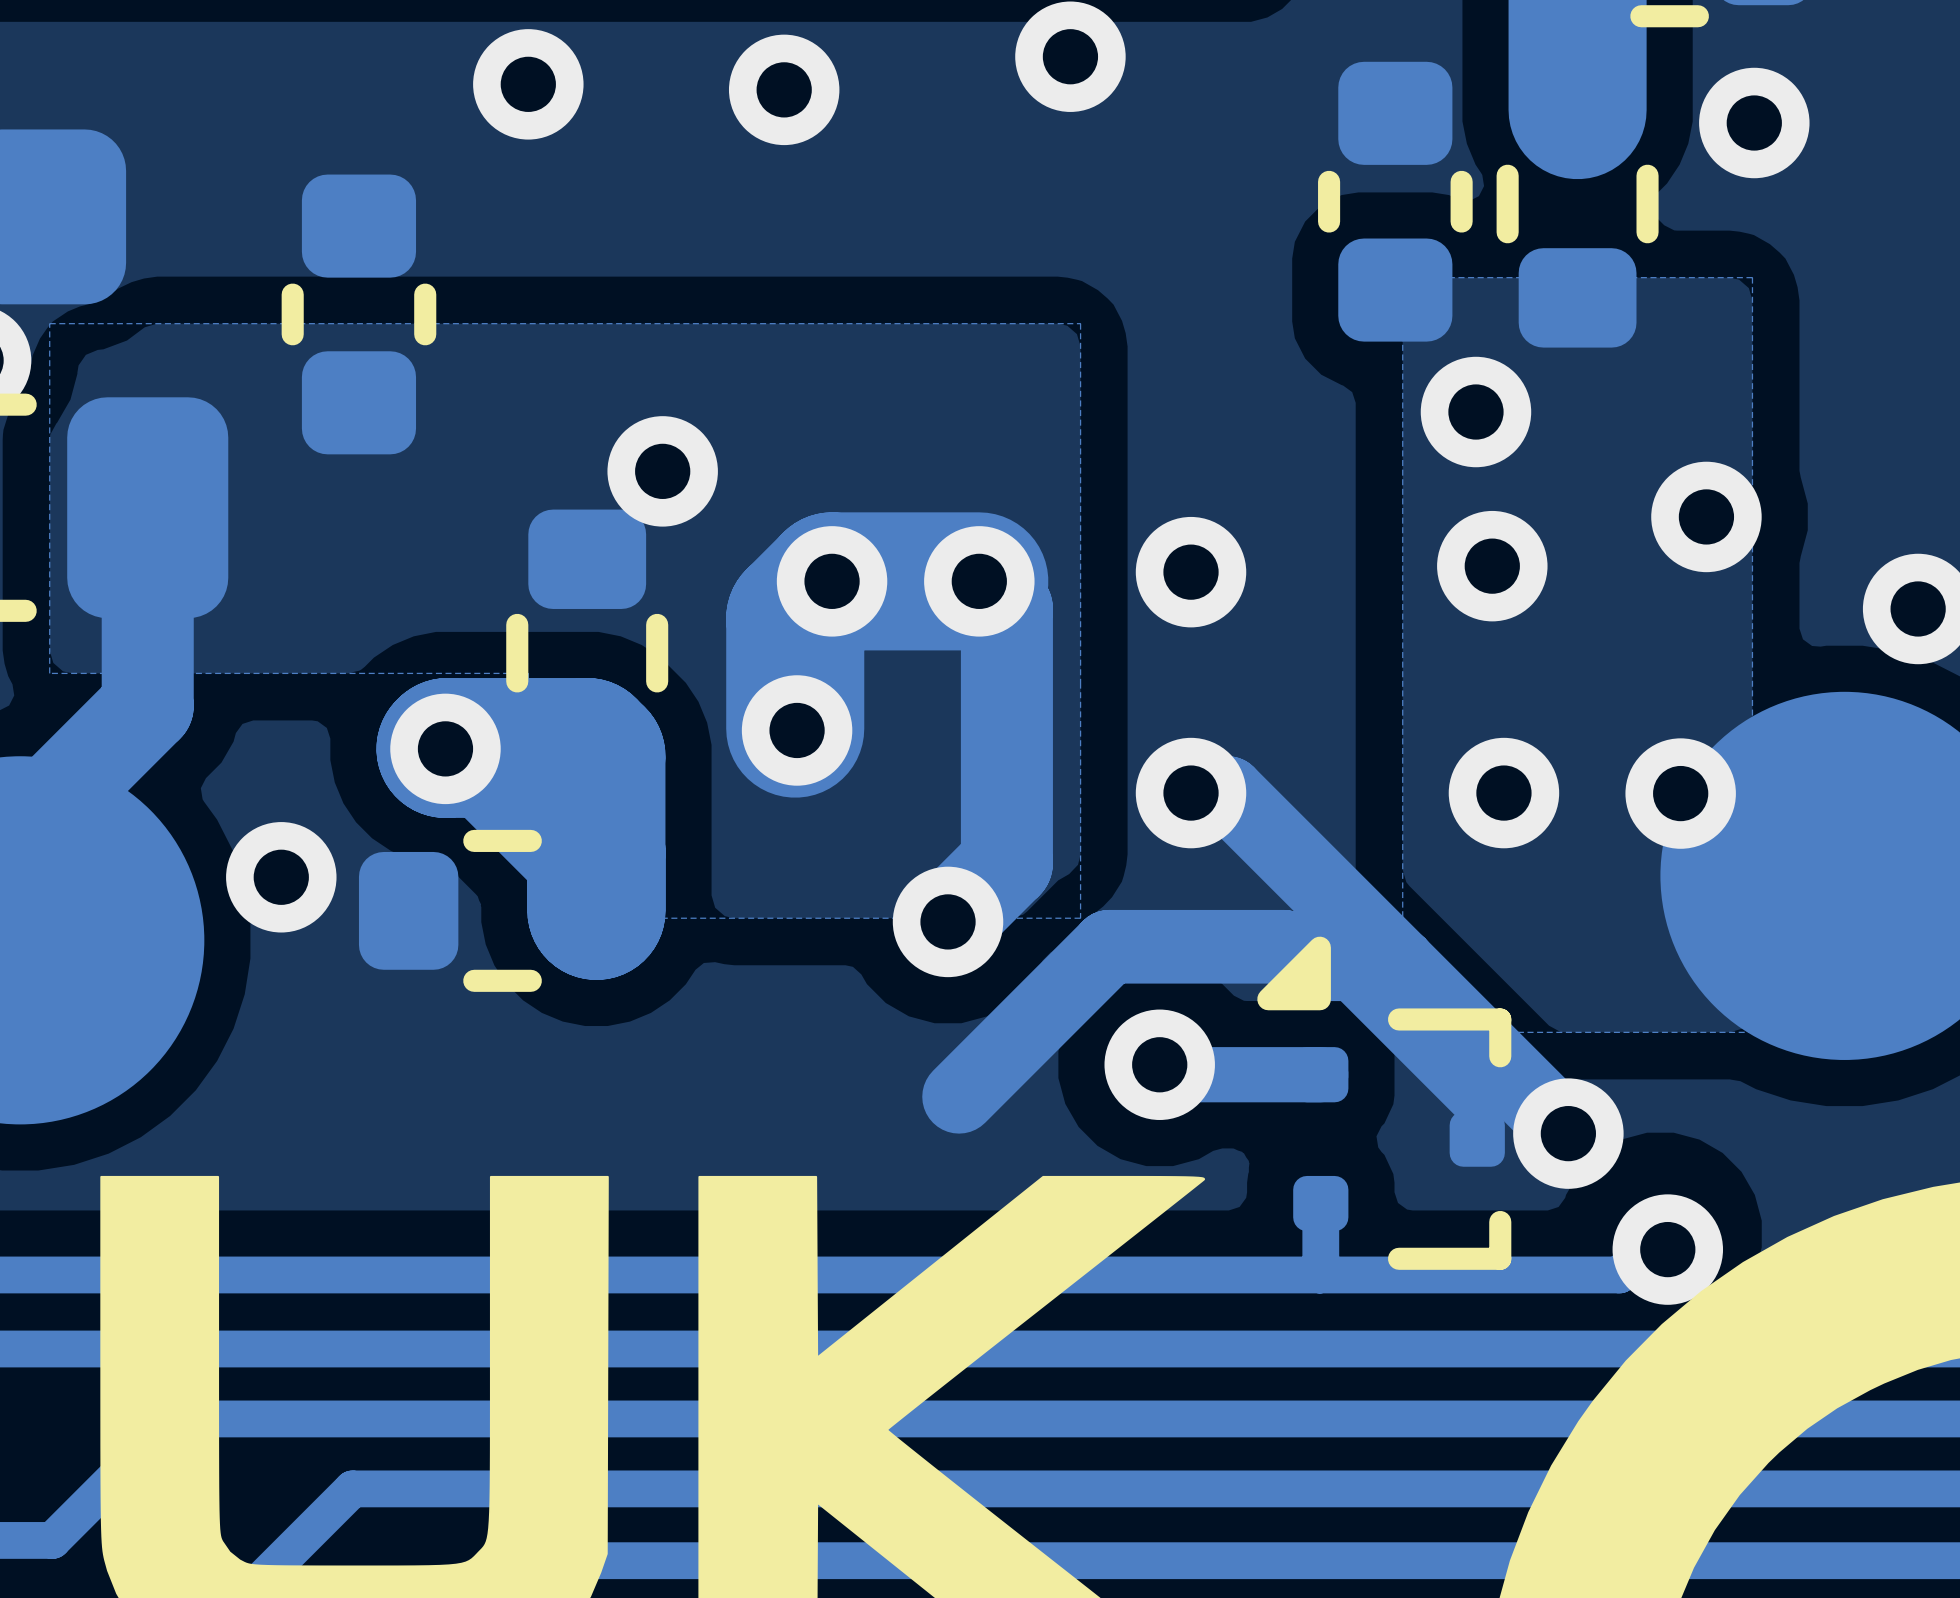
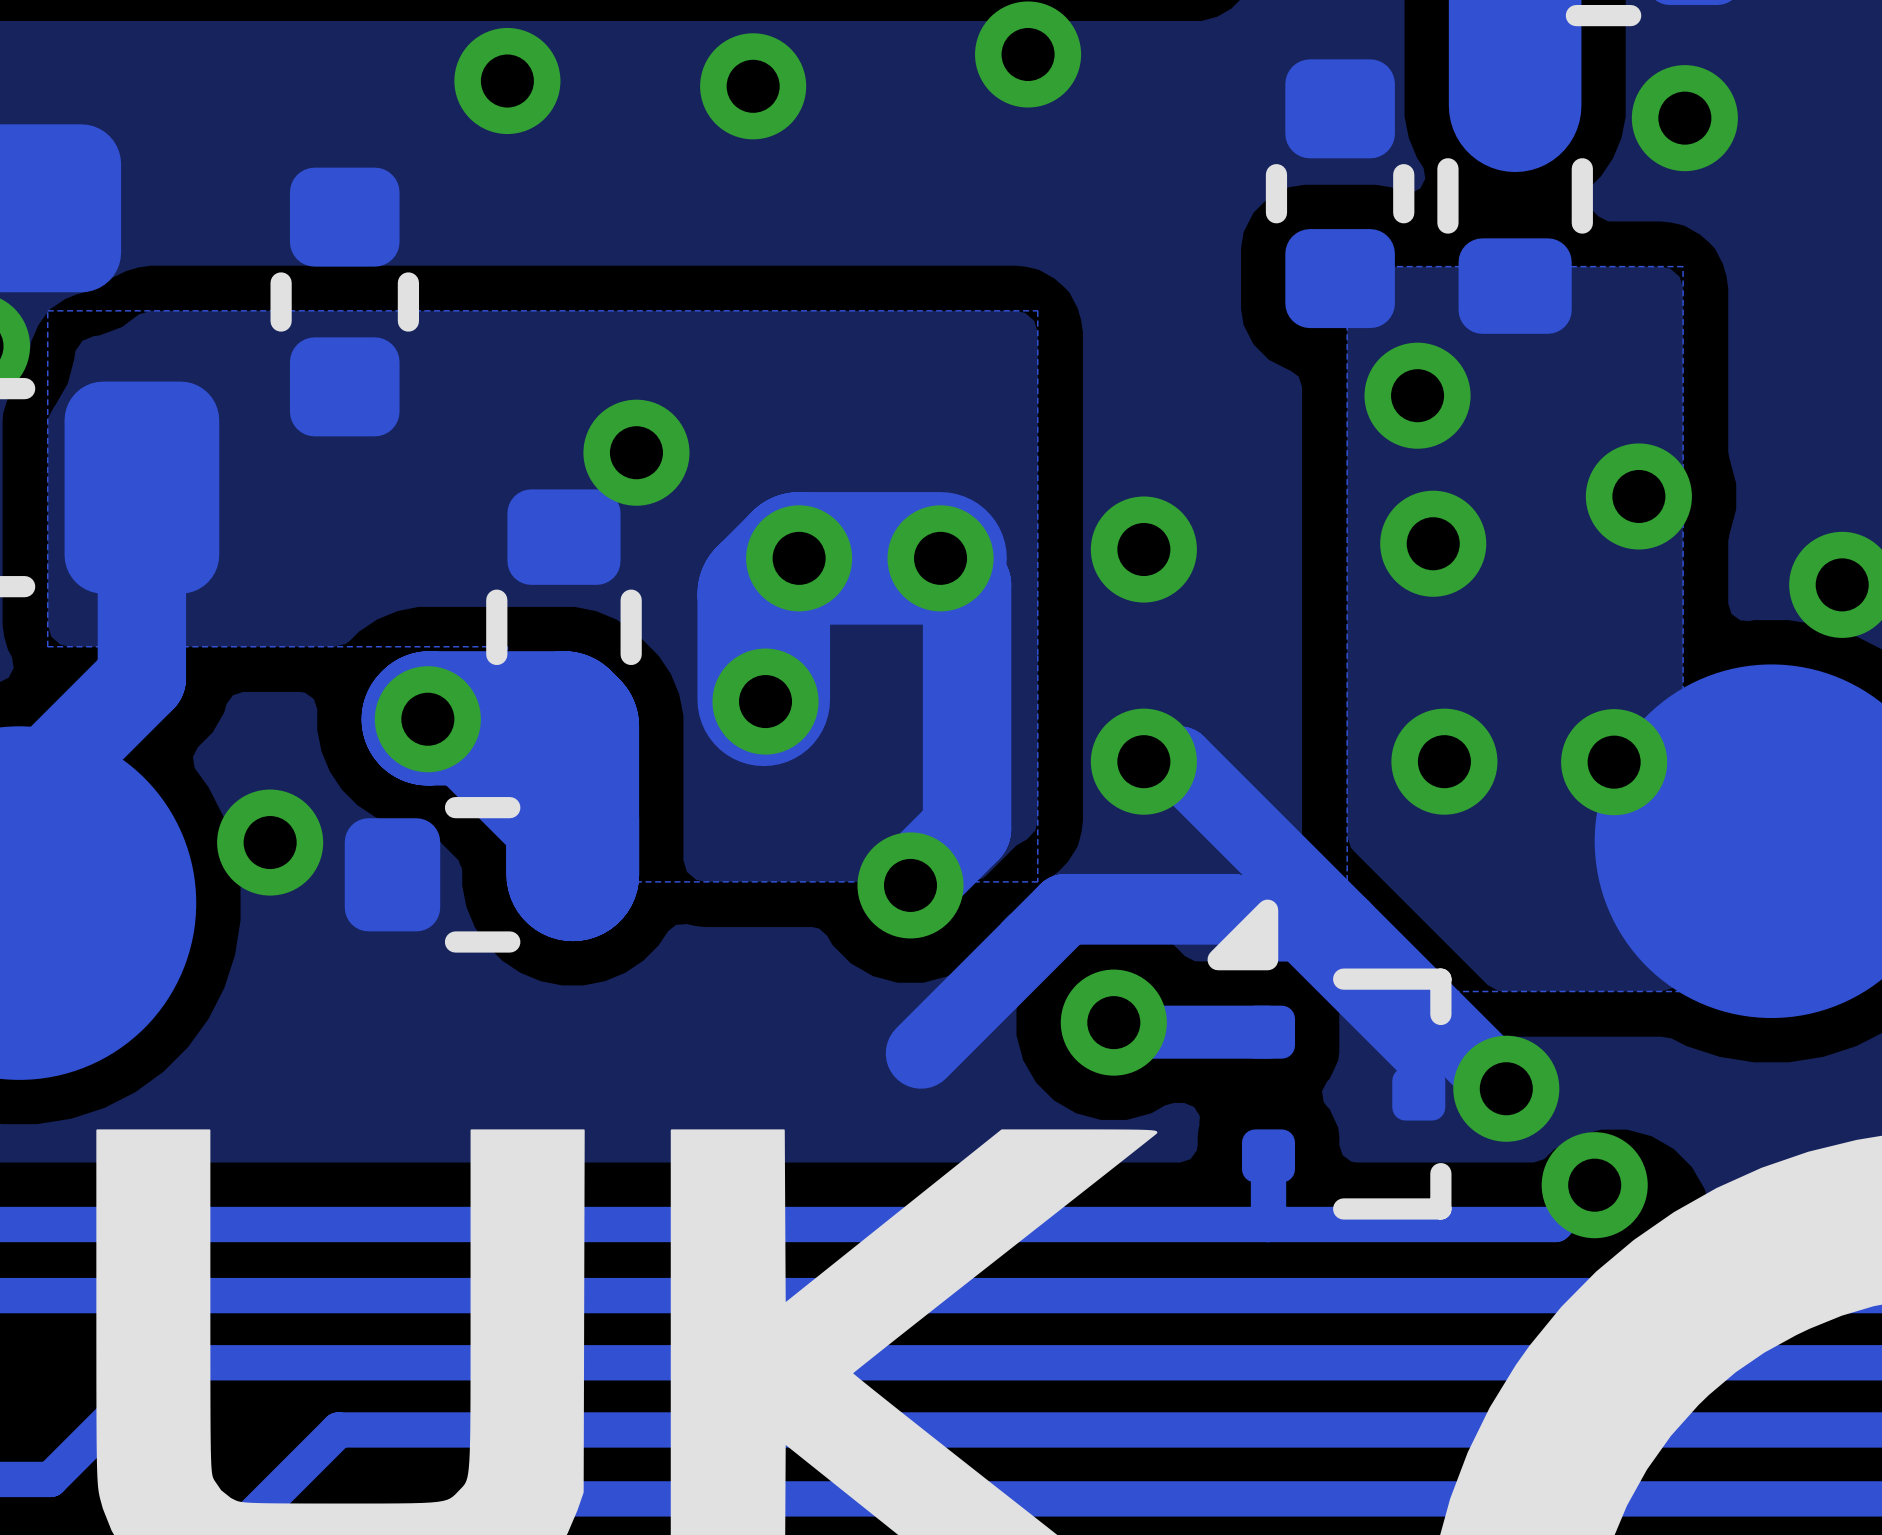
via position: (1667, 1249) -> (1594, 1185)

